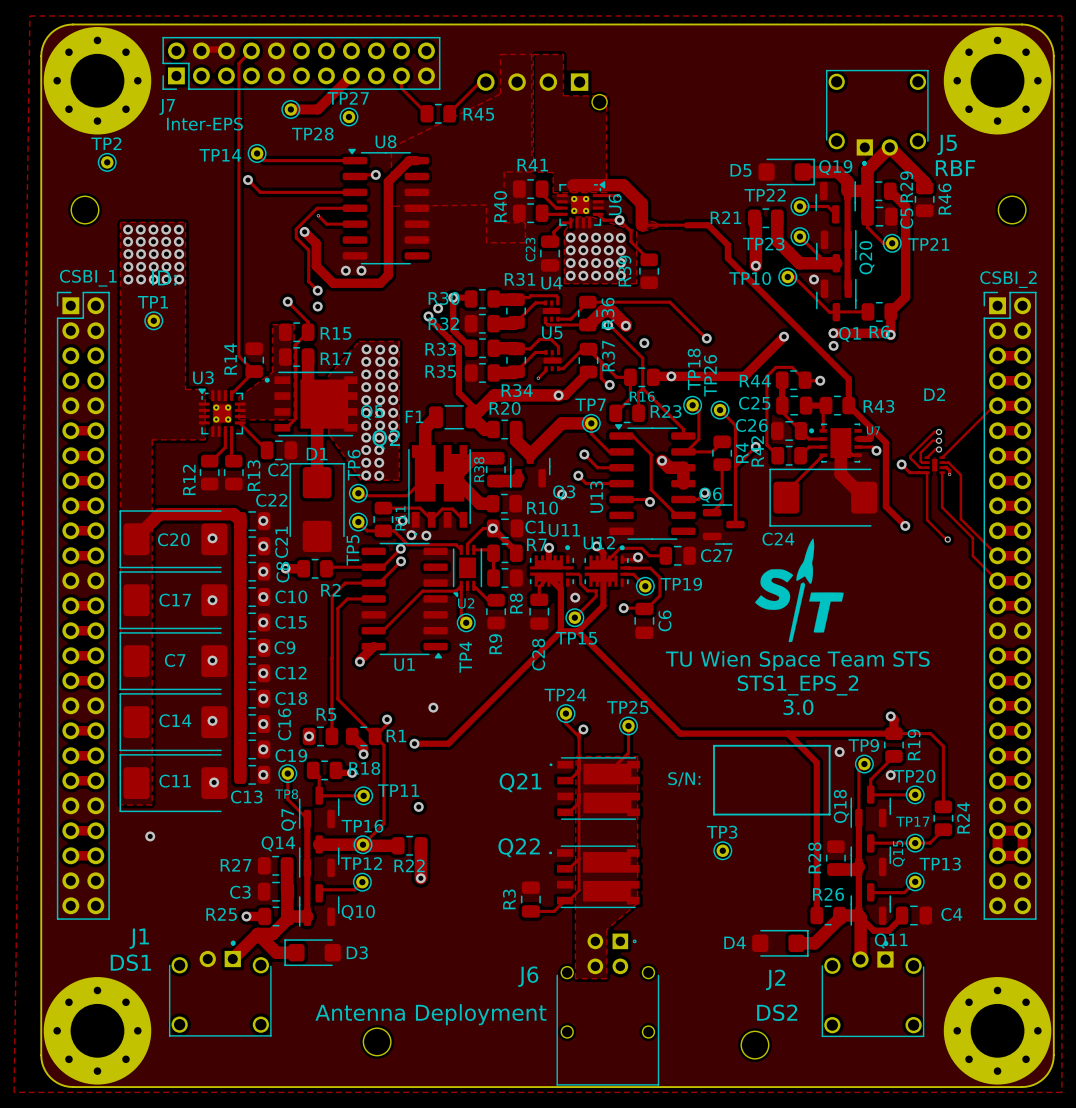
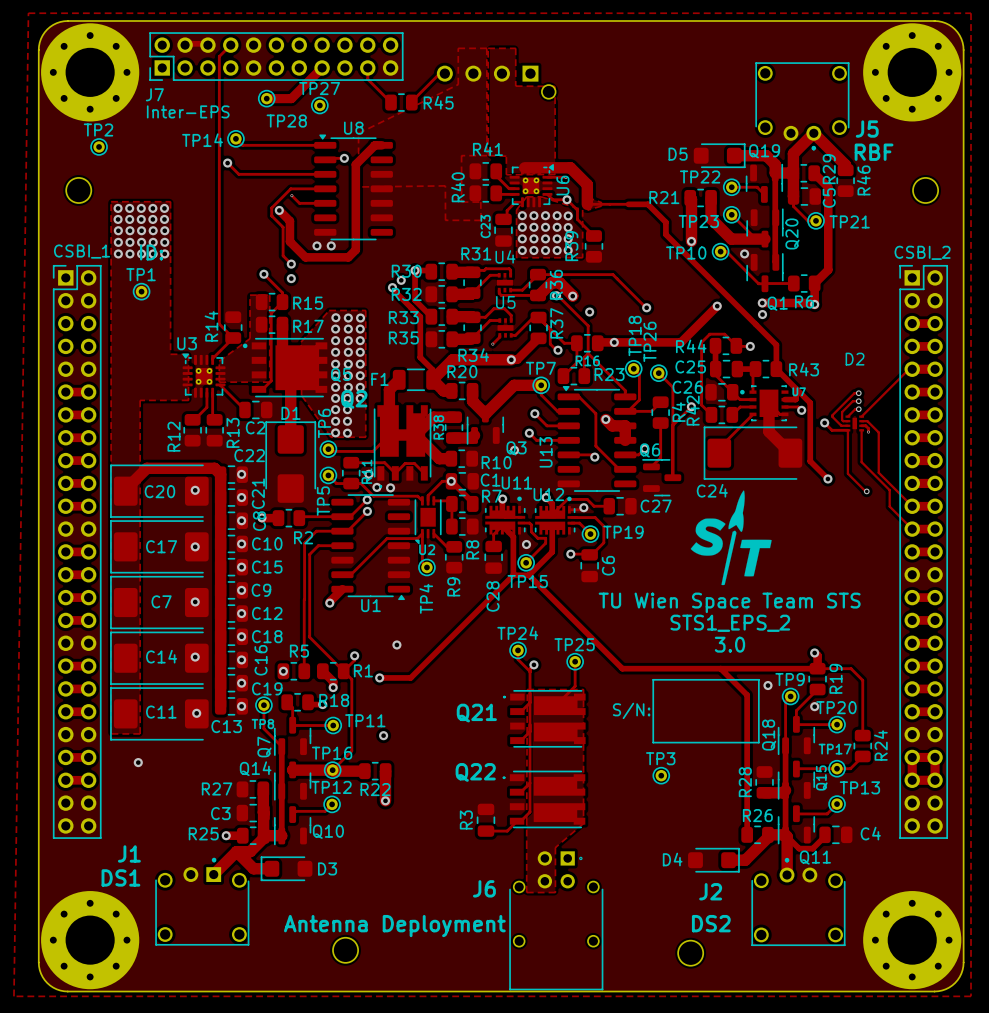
J5 footprint: [826, 69, 929, 166] -> [755, 62, 850, 151]
J2 footprint: [821, 941, 925, 1038] -> [751, 857, 846, 946]

